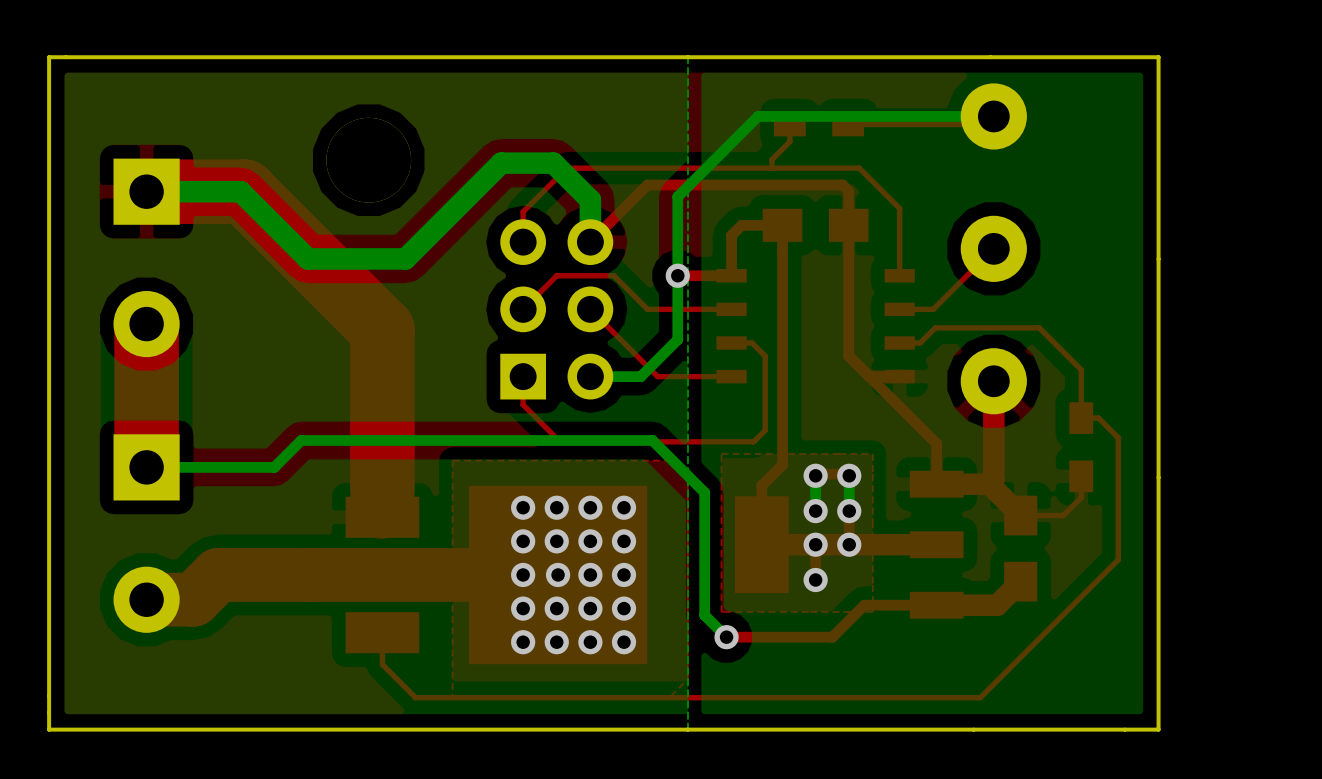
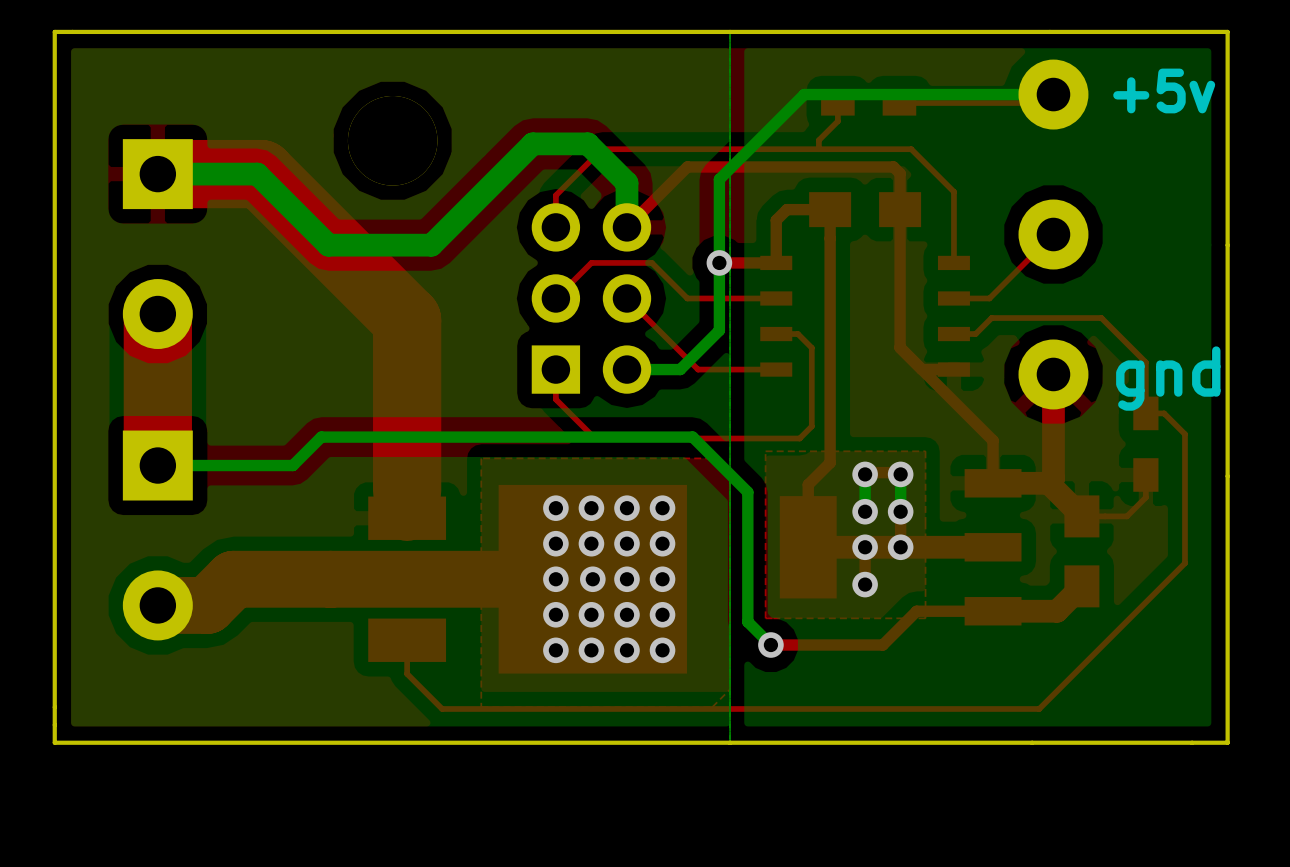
text: none -> +5v (1164, 90)
text: none -> gnd (1168, 378)

